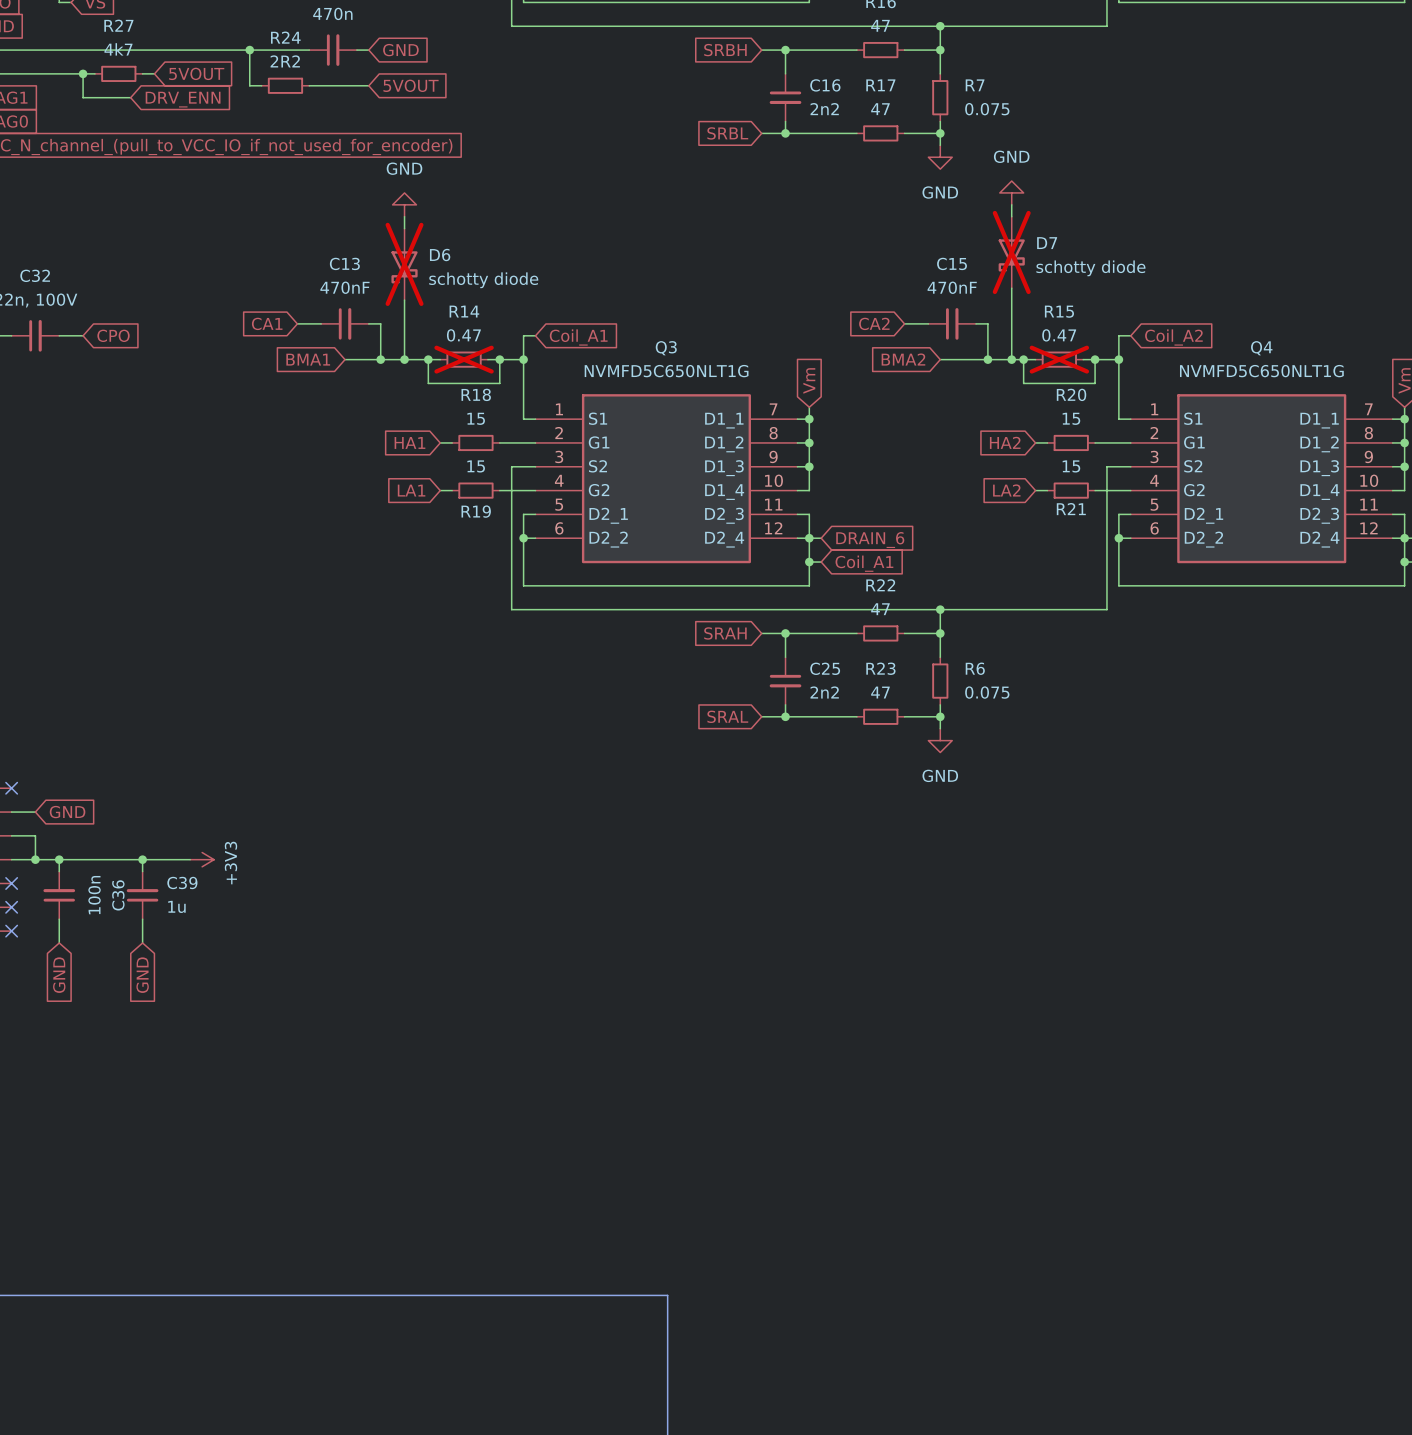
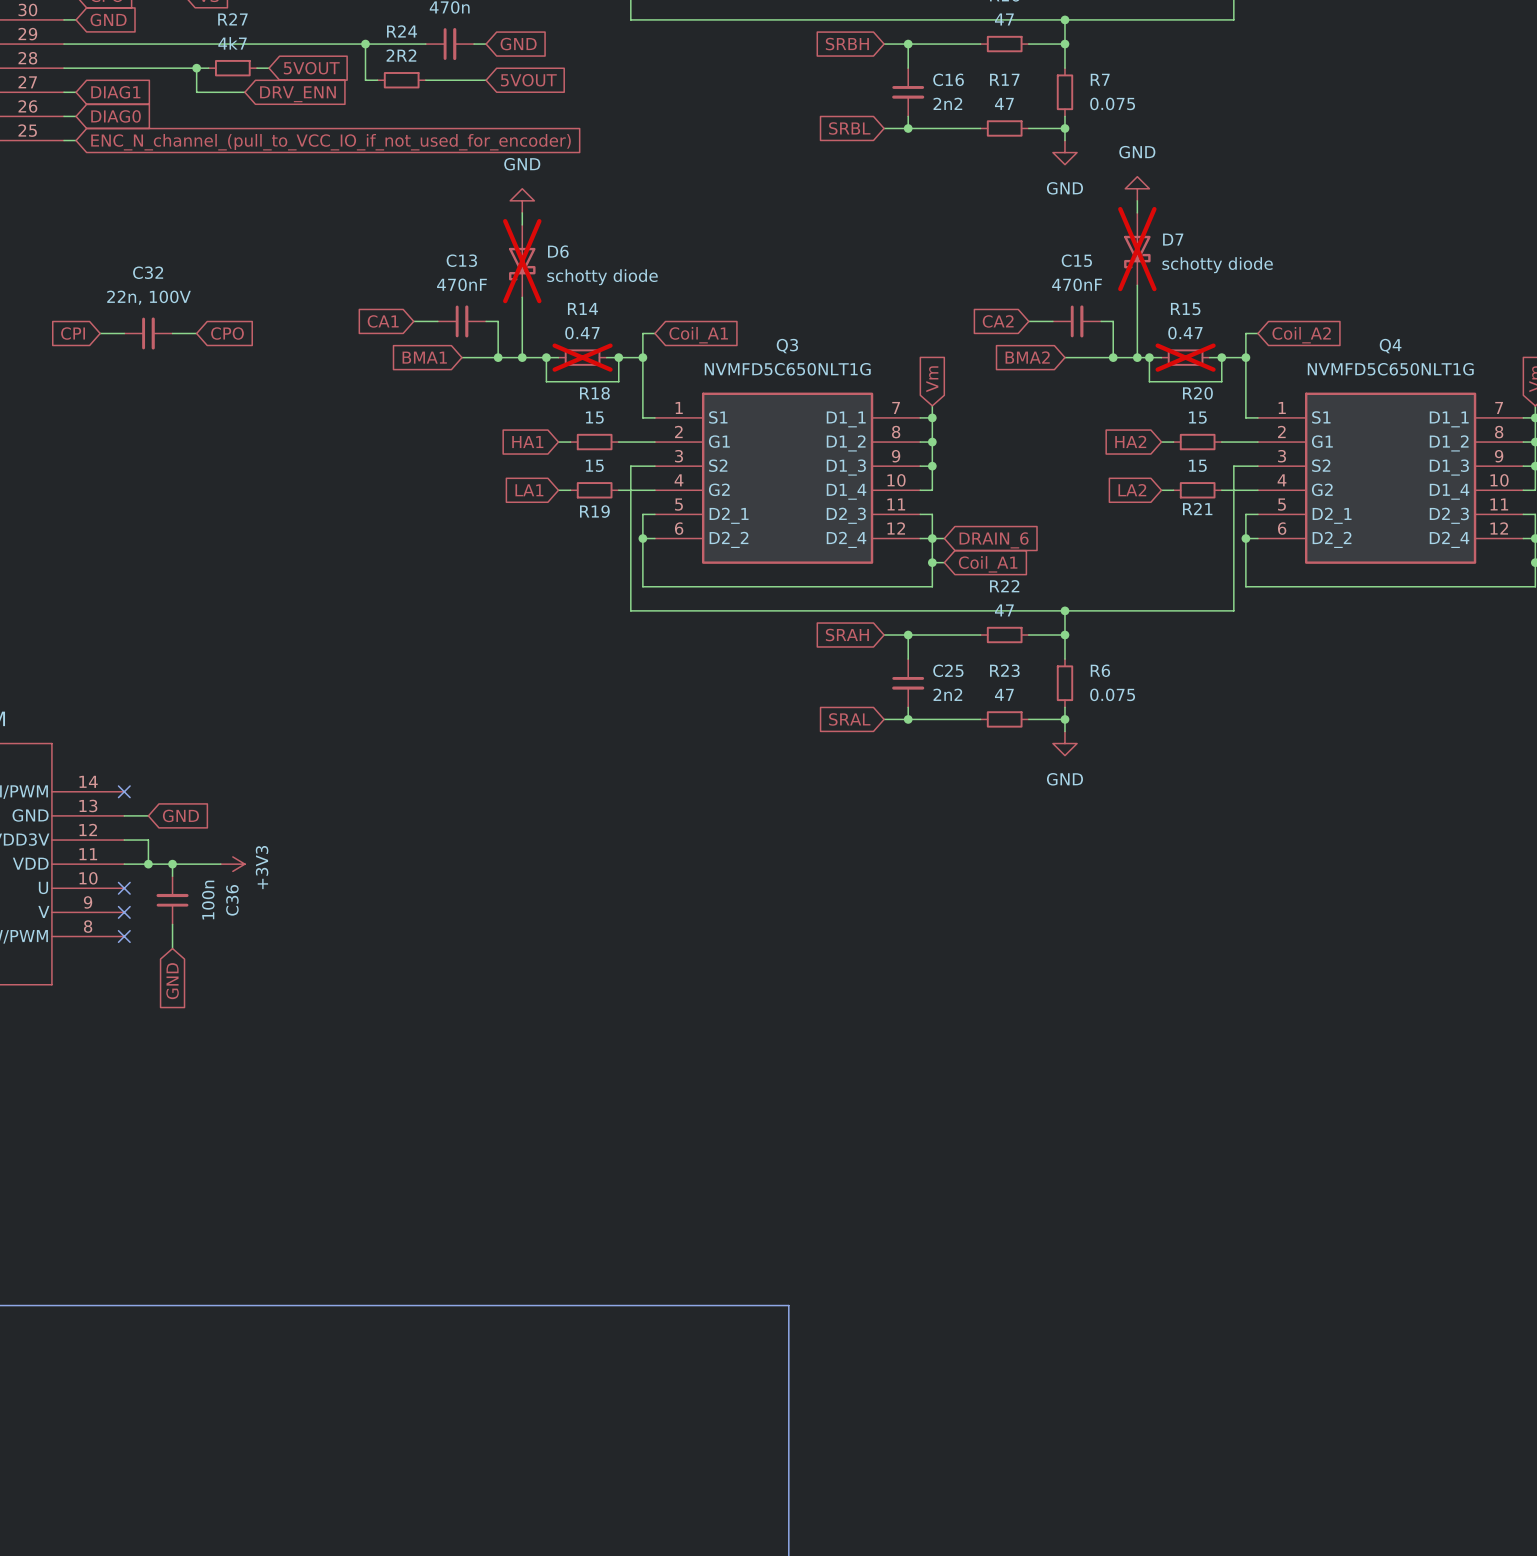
wire: (106, 859) (190, 859) -> none
junction: (142, 859) -> none
power symbol position: +3V3 (202, 859) -> +3V3 (232, 864)
C39: 1u (142, 895) -> none
wire: (142, 919) (142, 943) -> none
global label: GND (142, 975) -> none

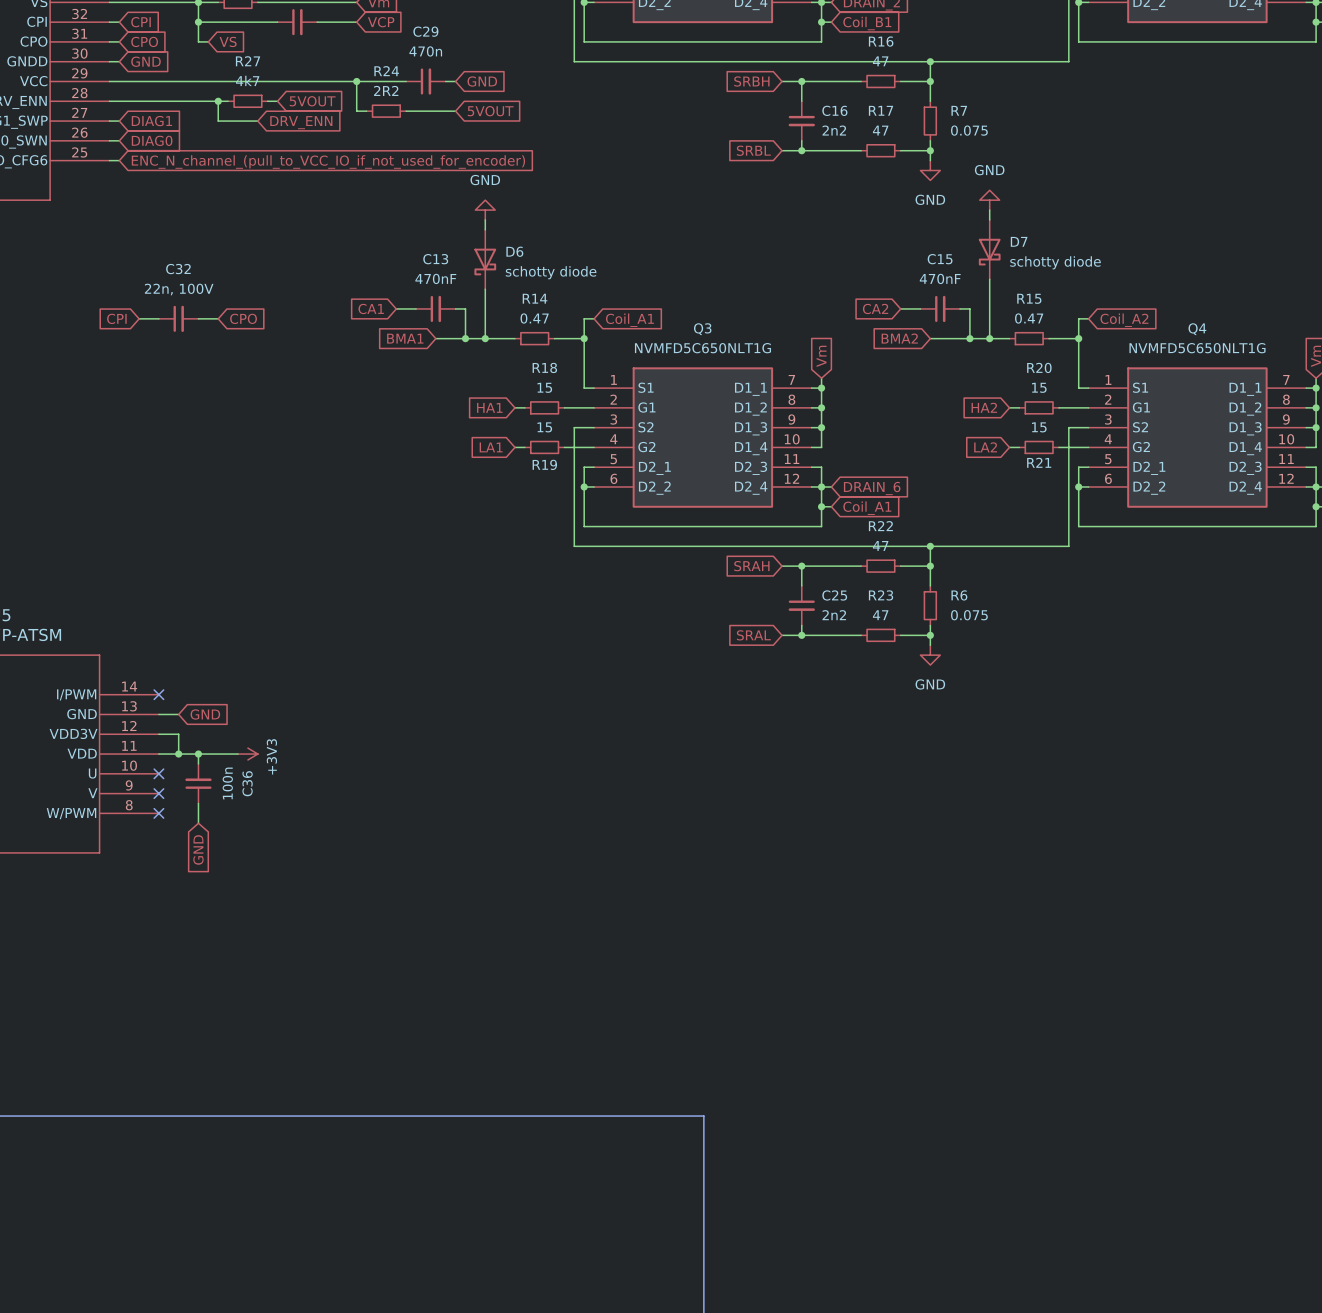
D7 do-not-place cross: (1137, 249) -> none
D6 do-not-place cross: (522, 261) -> none
wire: (546, 357) (546, 381) (618, 381) (618, 357) -> none
junction: (546, 357) -> none
R14 do-not-place cross: (582, 357) -> none
junction: (618, 357) -> none
wire: (1149, 357) (1149, 381) (1221, 381) (1221, 357) -> none
junction: (1149, 357) -> none
R15 do-not-place cross: (1185, 357) -> none
junction: (1221, 357) -> none

